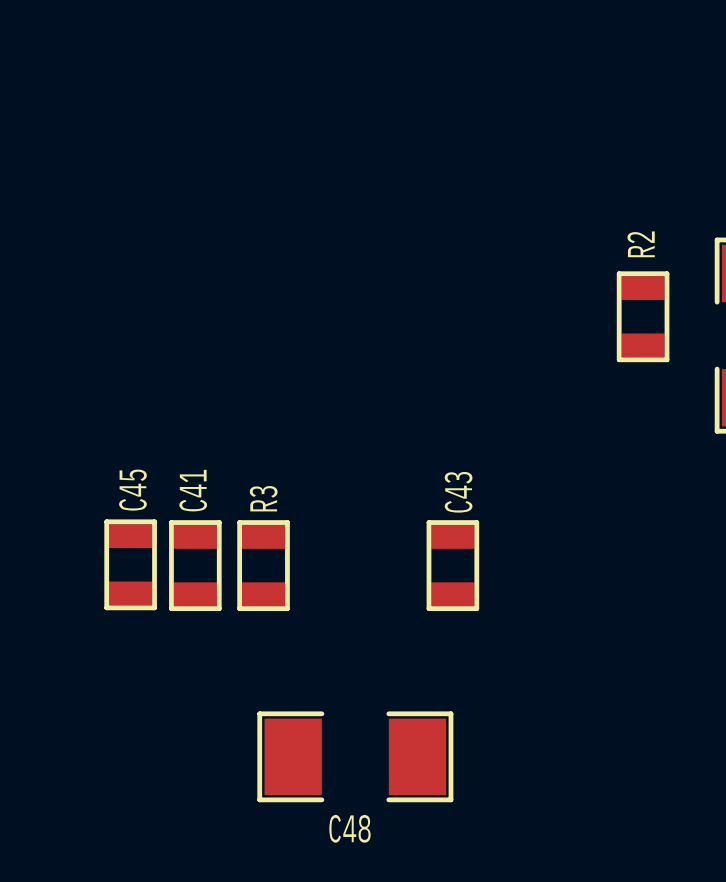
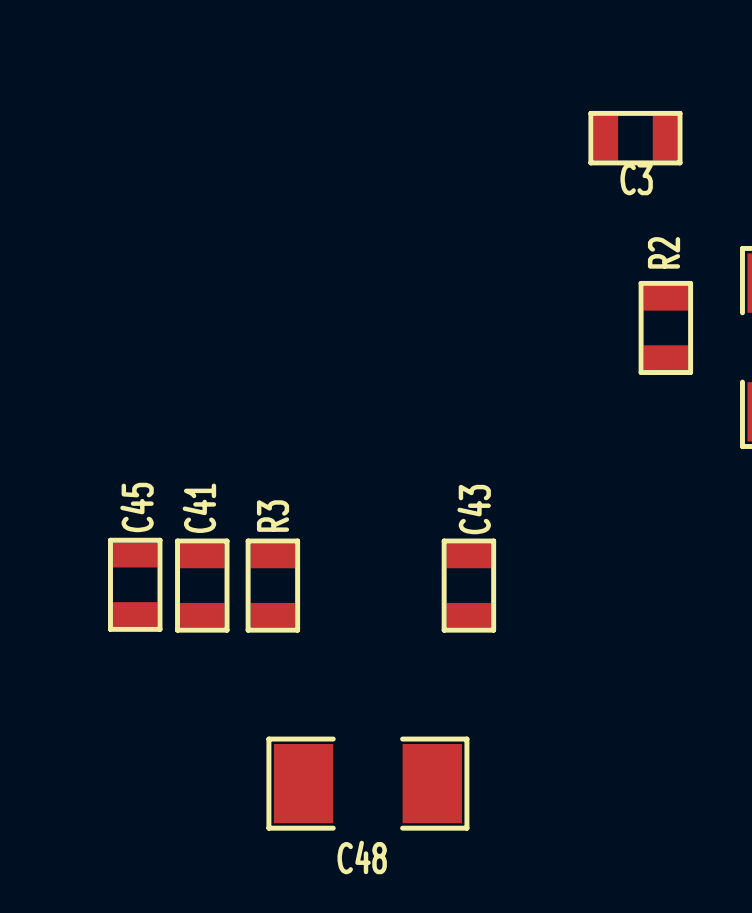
C3: none -> (635, 138)

